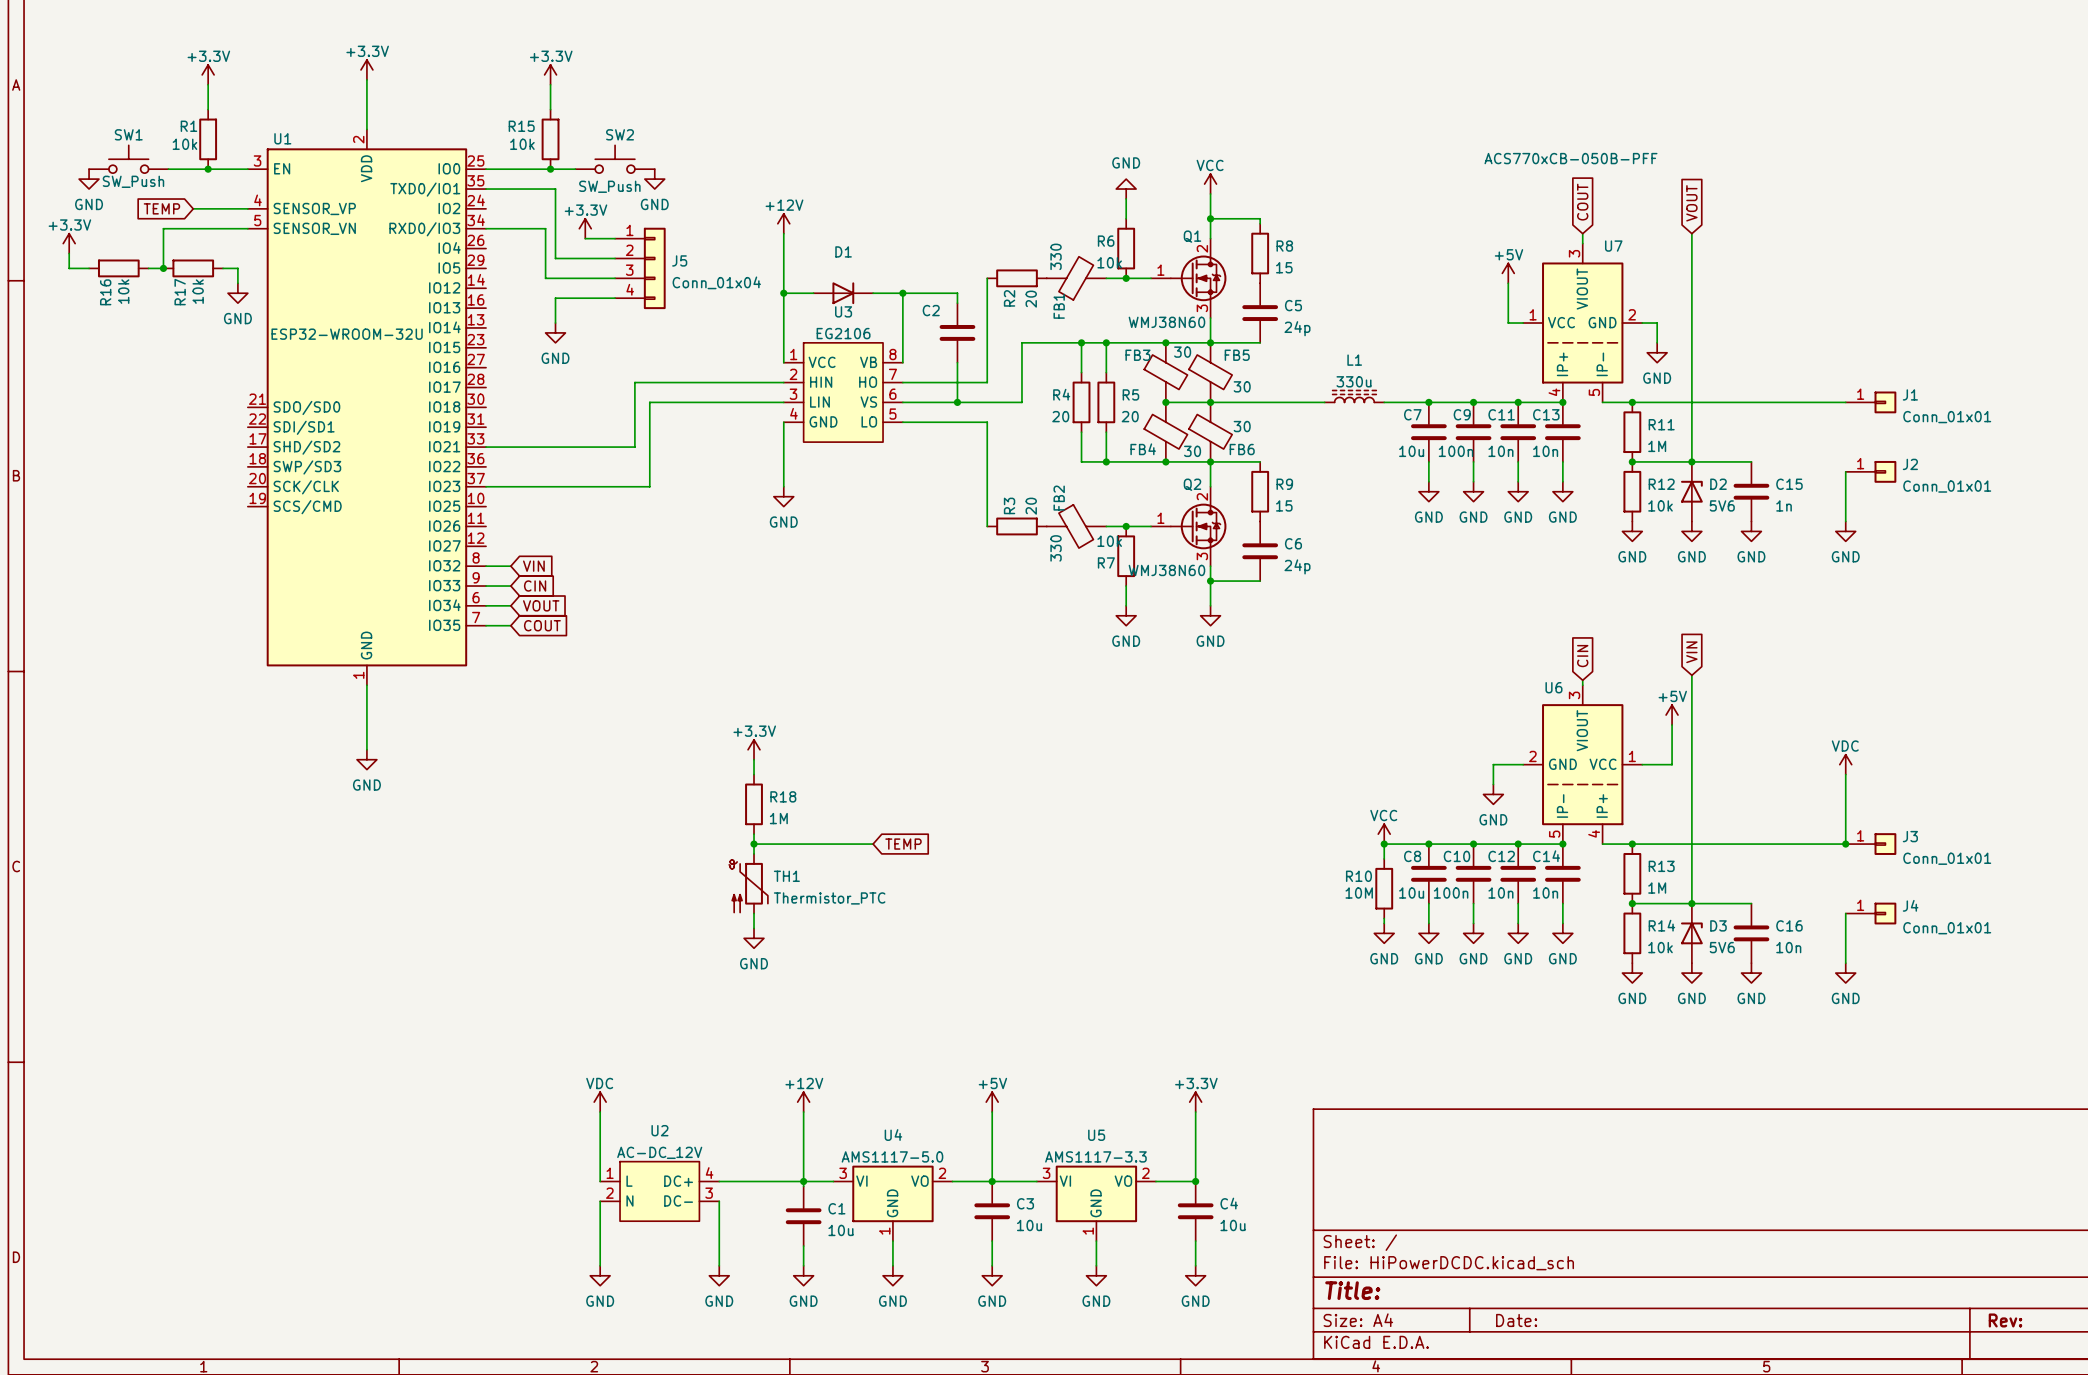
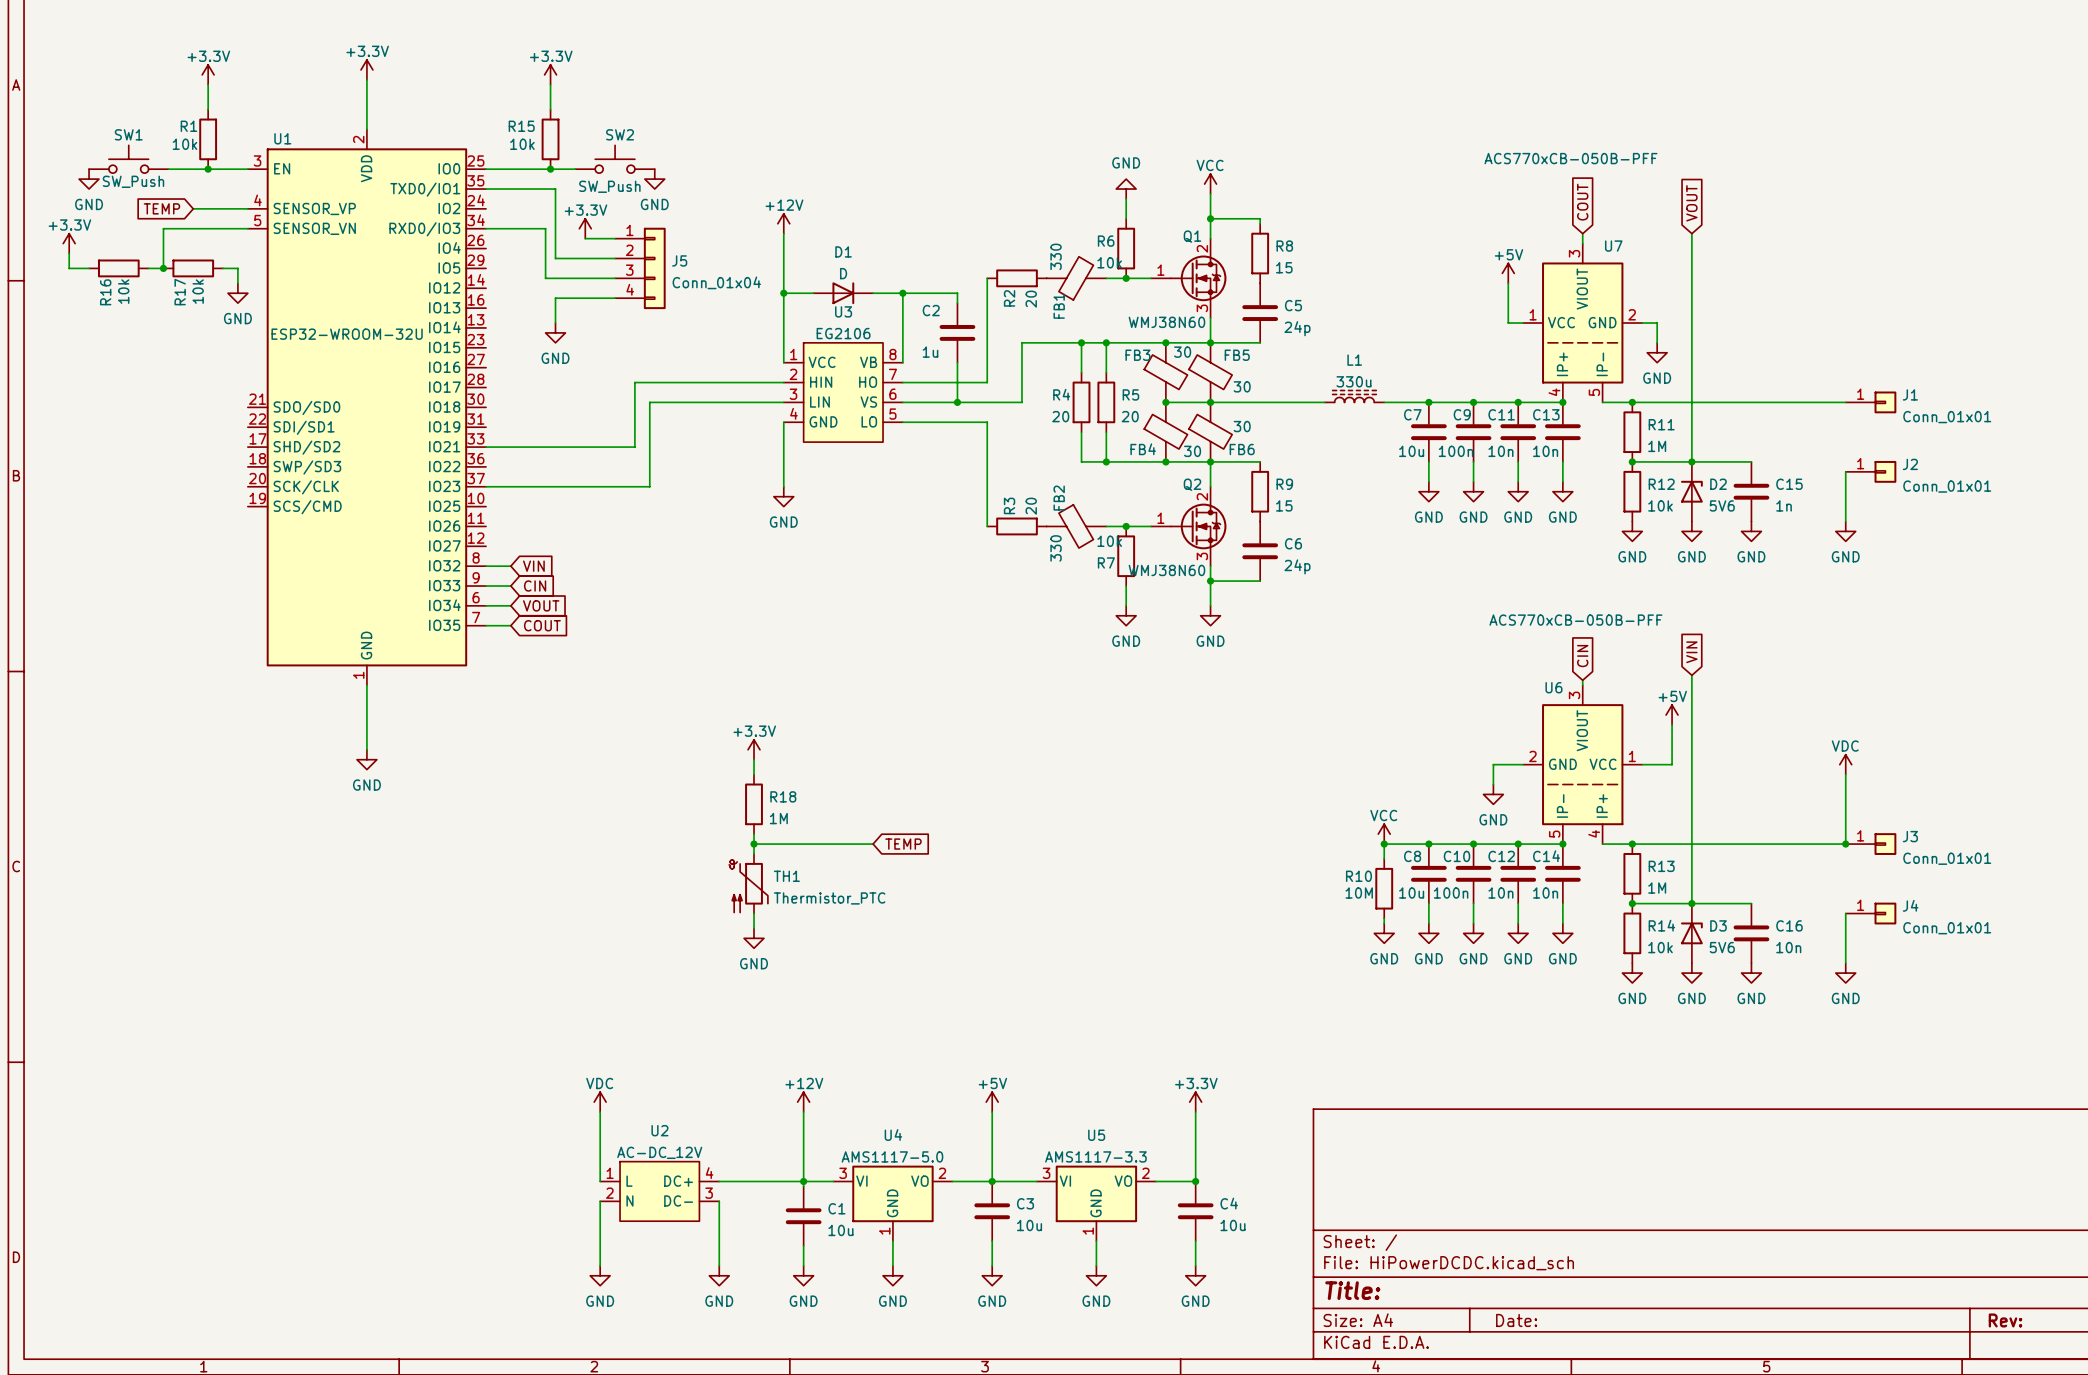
D1 value: none -> D (843, 273)
C2 value: none -> 1u (930, 352)
U6 value: none -> ACS770xCB-050B-PFF (1575, 620)

